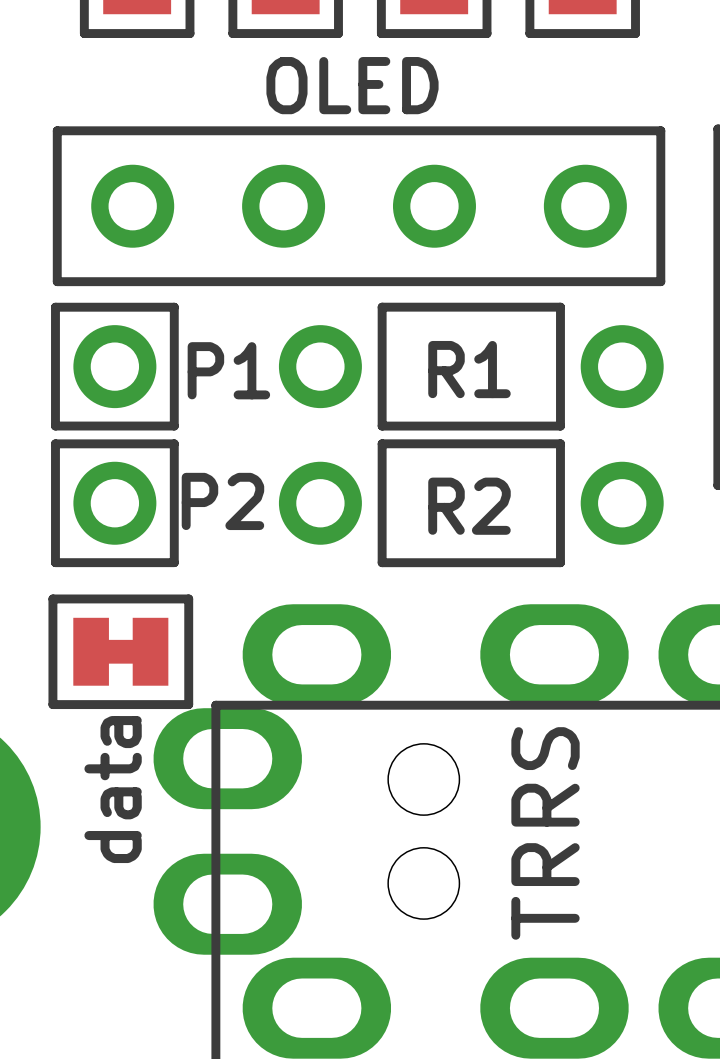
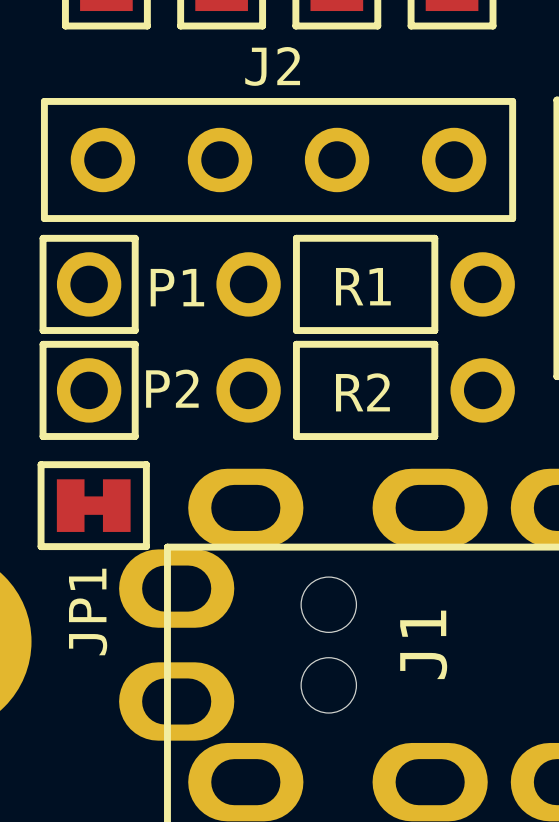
OLED name: OLED (352, 85) -> J2 (272, 66)
data name: data (113, 789) -> JP1 (88, 612)
TRRS name: TRRS (545, 833) -> J1 (423, 644)

